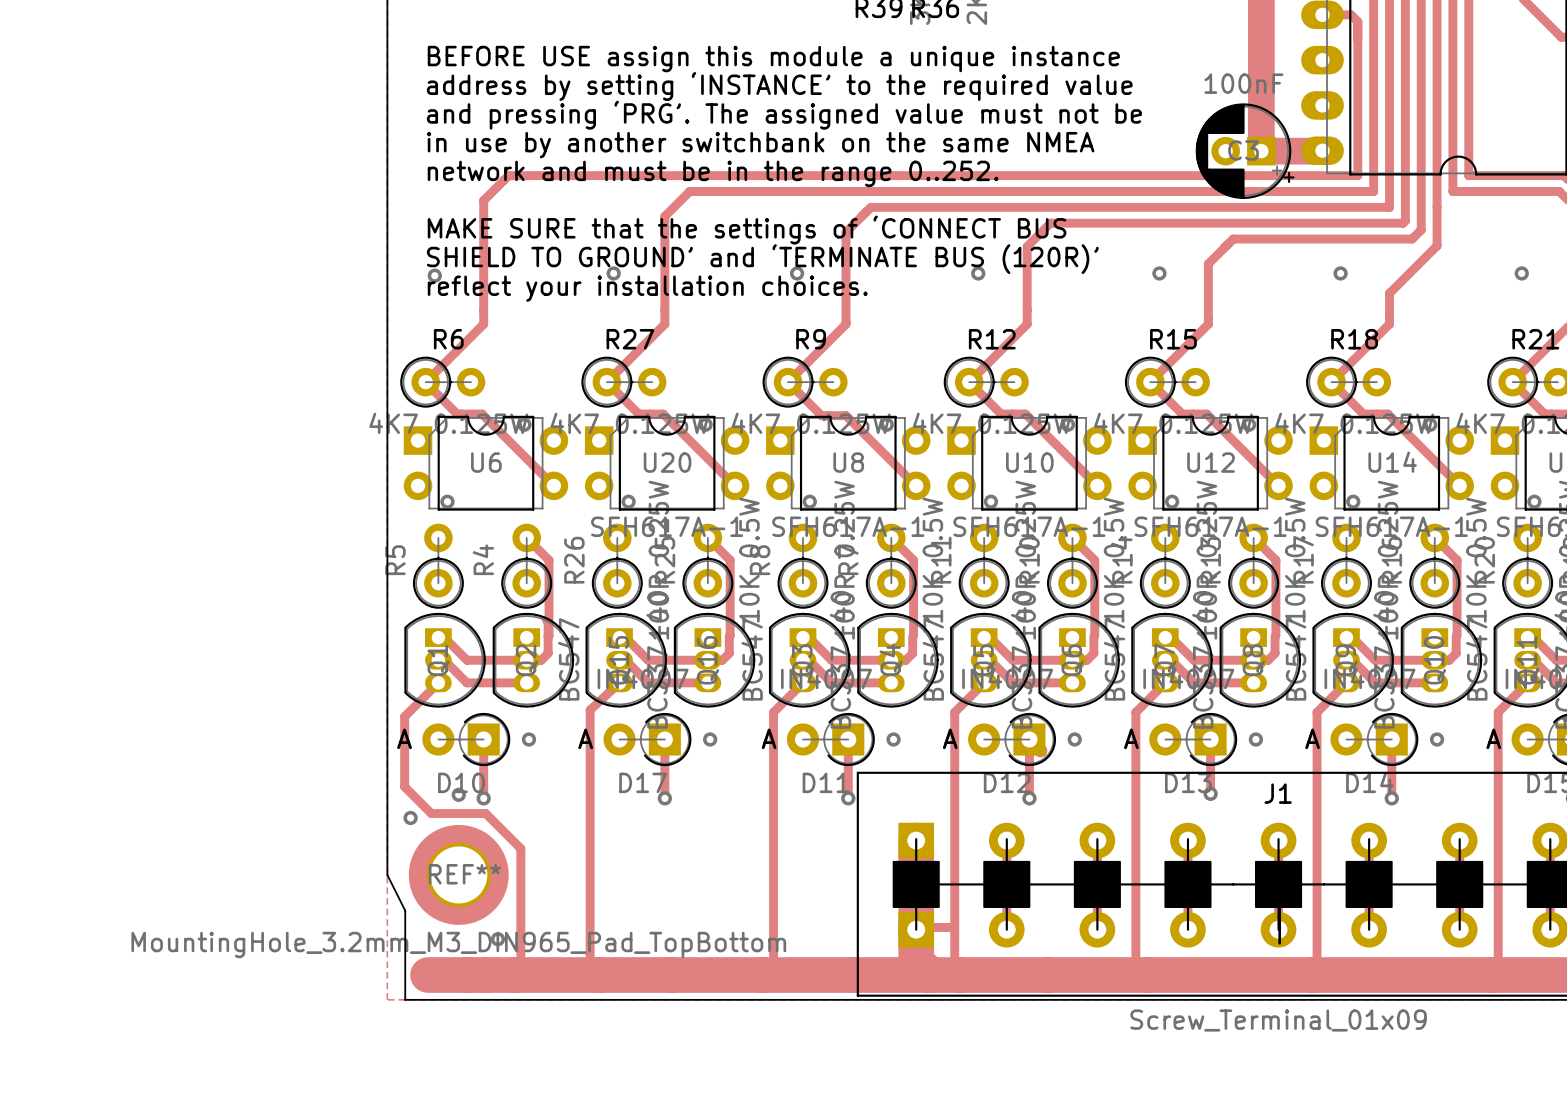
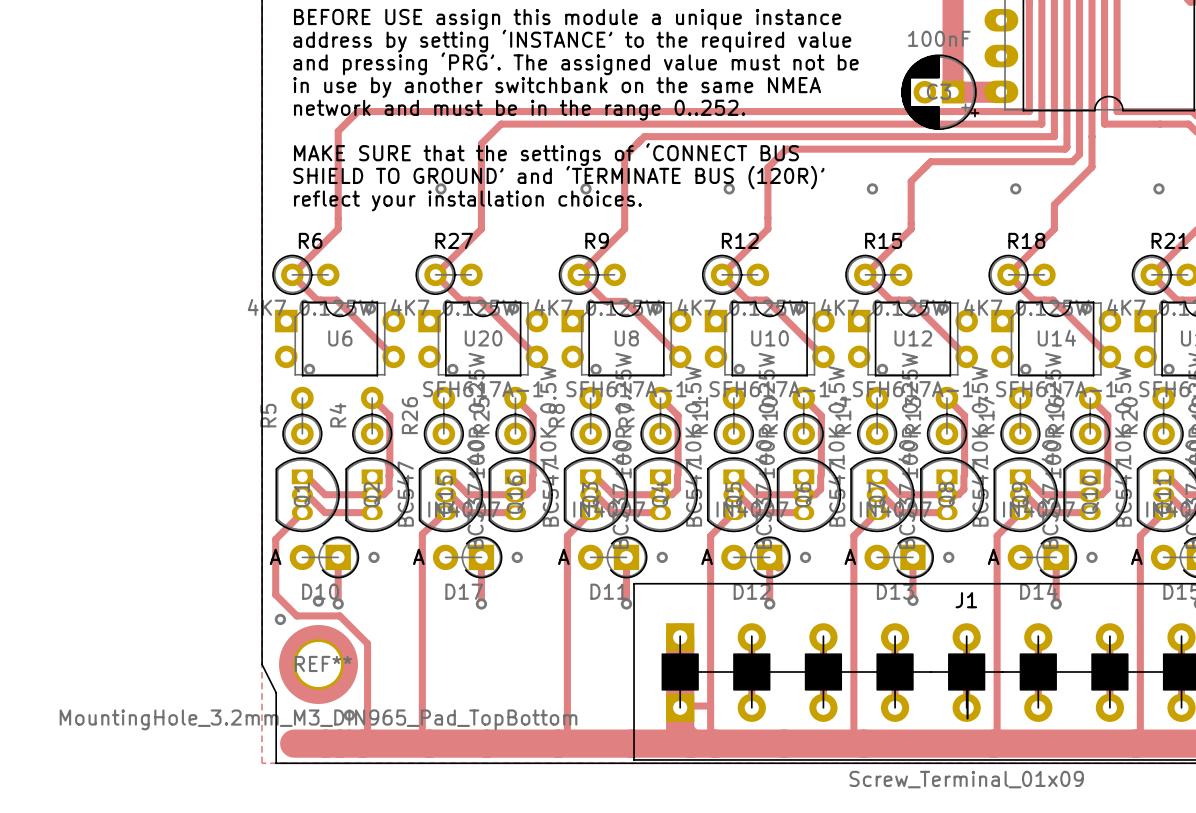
via: (434, 275) -> none

